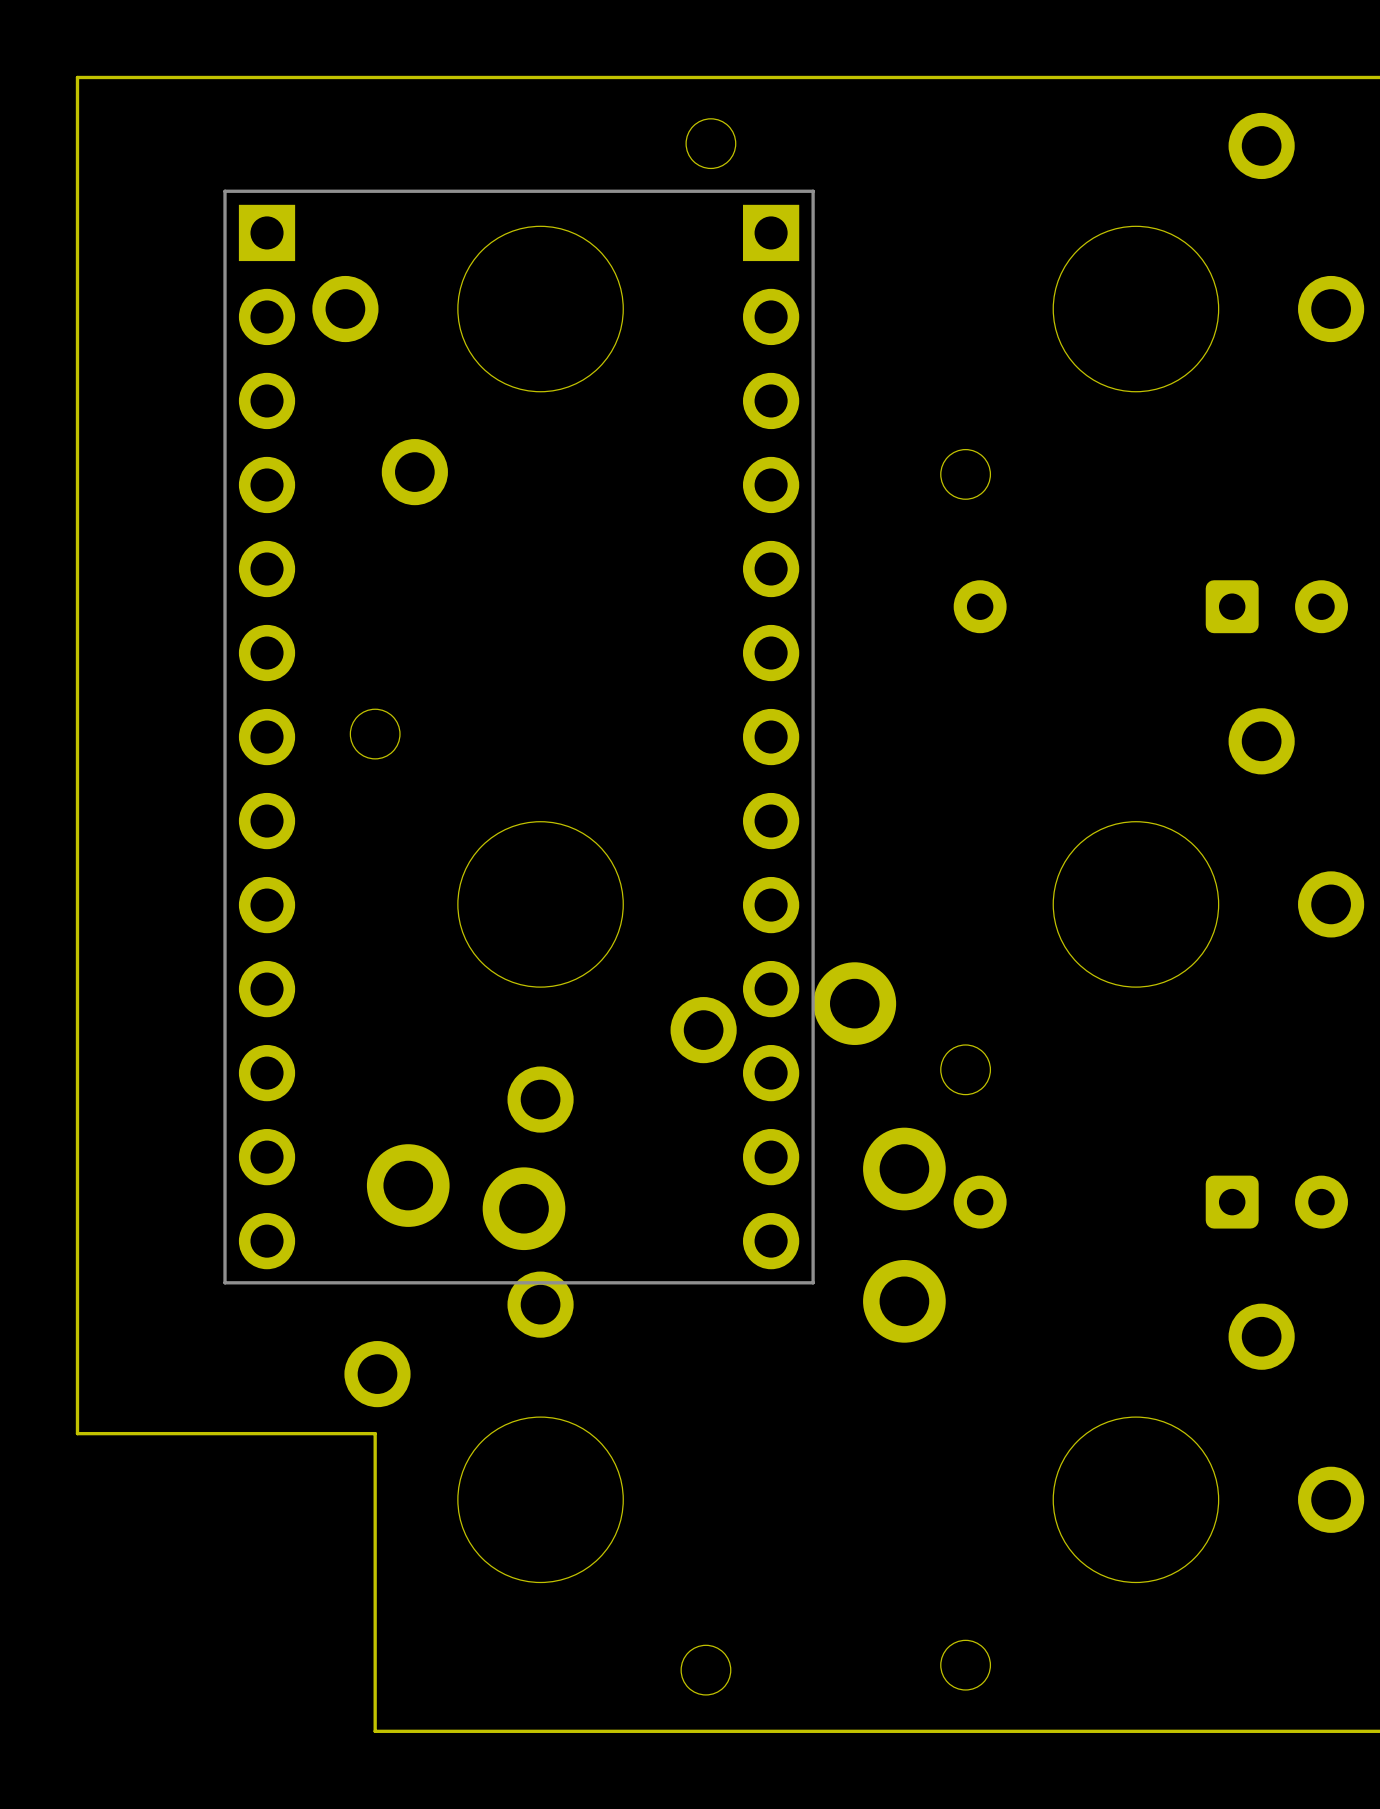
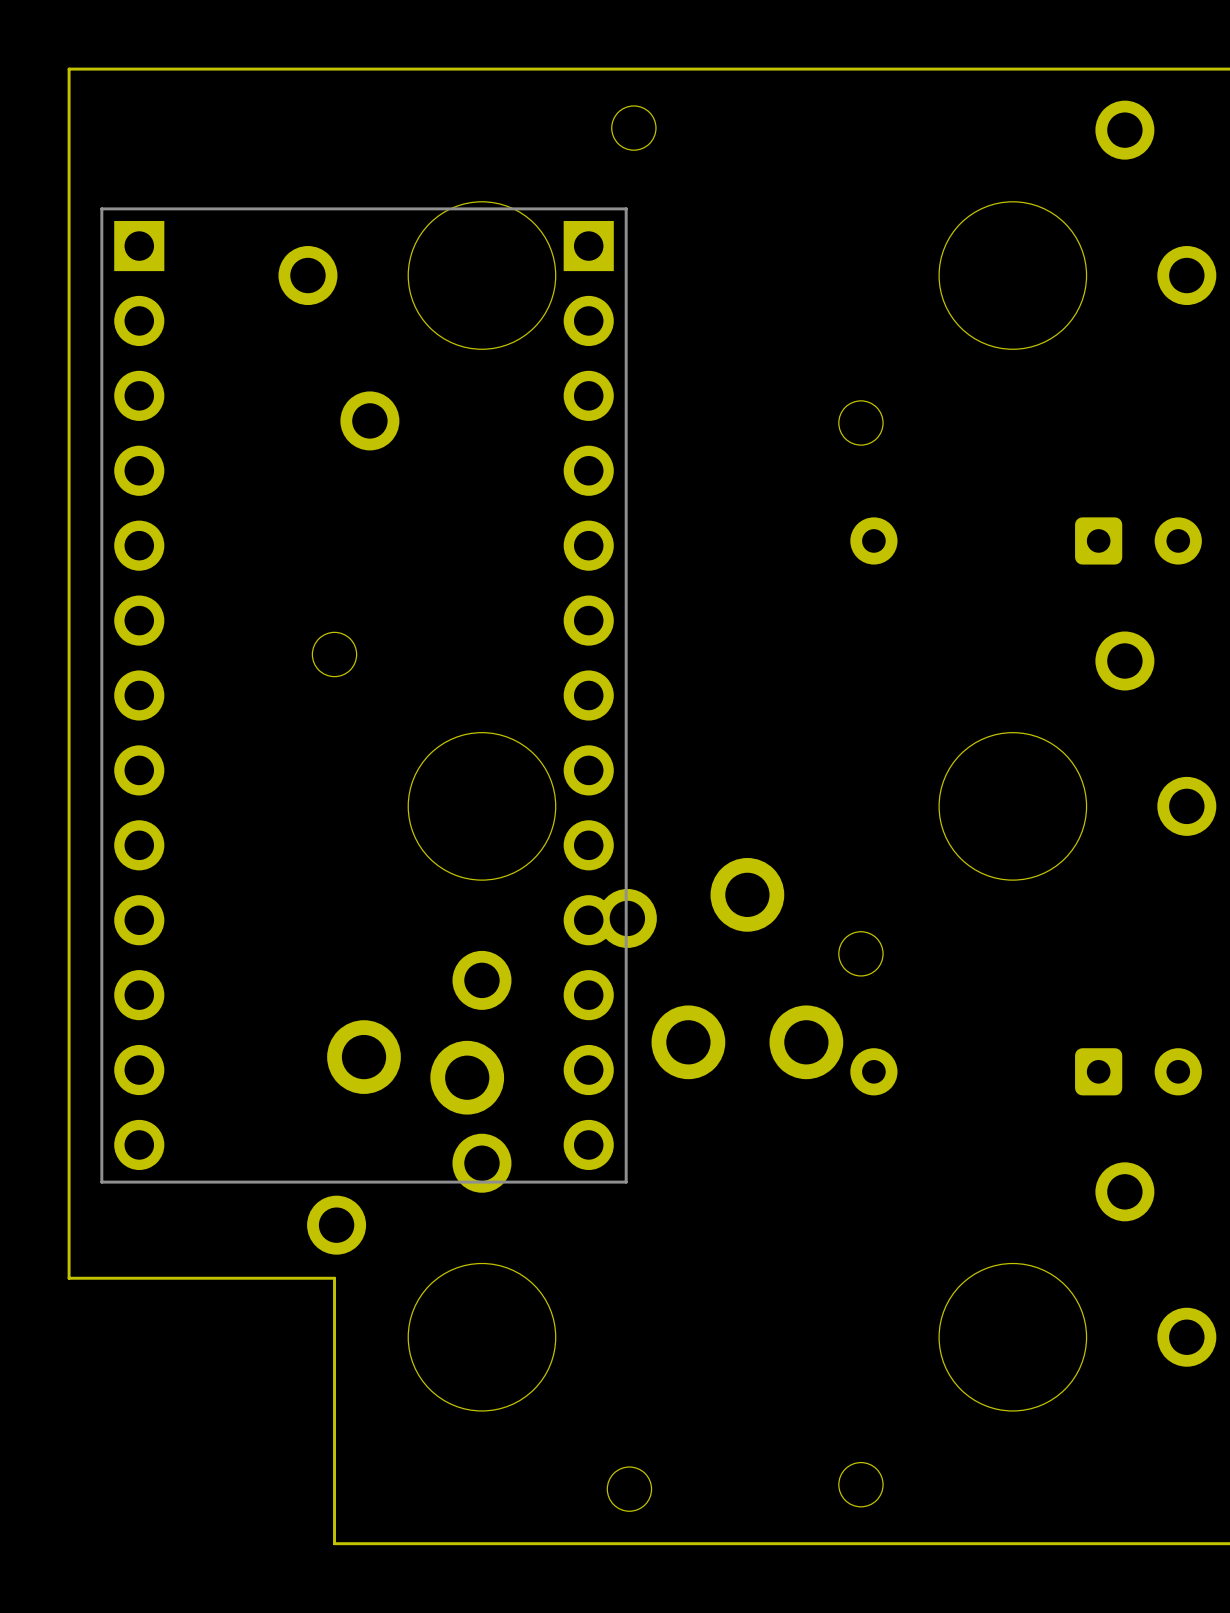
line: (813, 191) (813, 1282) (225, 1282) (225, 191) (813, 191) -> (626, 208) (626, 1182) (101, 1182) (101, 208) (626, 208)
part position: (267, 737) -> (139, 695)
part position: (771, 737) -> (588, 695)
part position: (854, 1003) -> (747, 894)
part position: (904, 1301) -> (688, 1042)

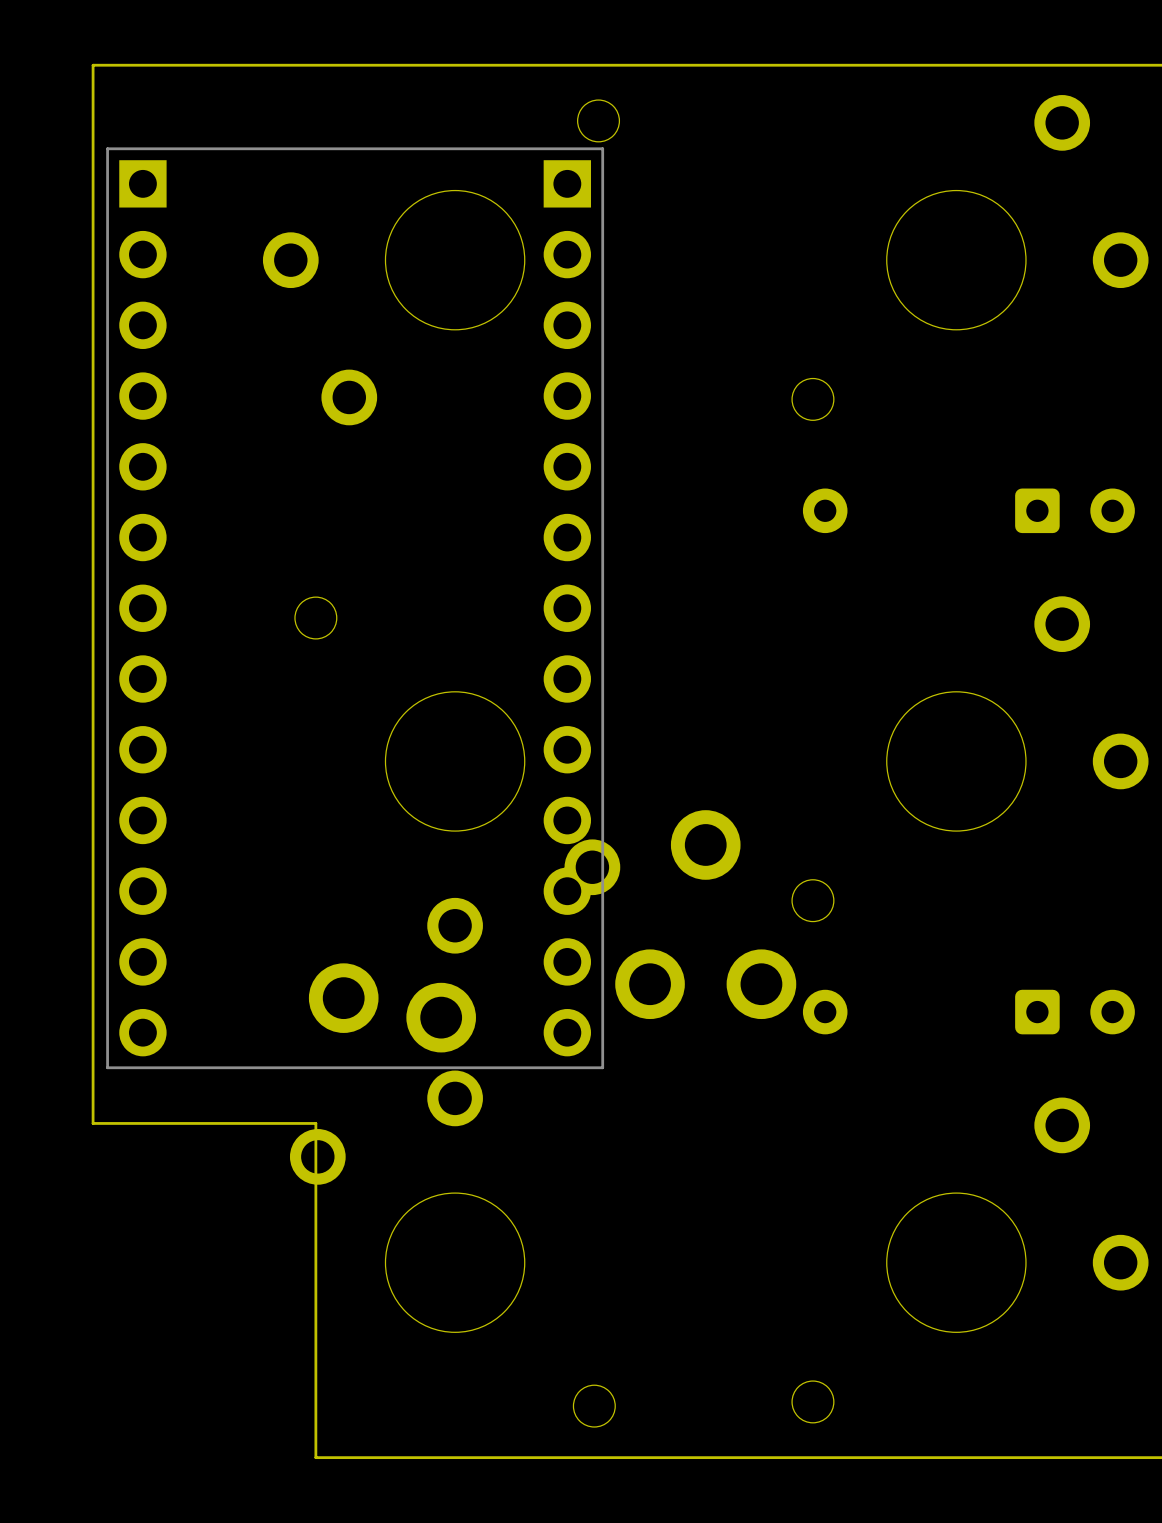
board edge: (98, 69) (69, 69) (69, 1278) (334, 1278) -> (93, 65) (93, 1123) (315, 1123) (315, 1207)
line: (626, 208) (626, 1182) (101, 1182) (101, 208) (626, 208) -> (602, 148) (602, 1067) (107, 1067) (107, 148) (602, 148)
part position: (139, 695) -> (142, 608)
part position: (588, 695) -> (567, 608)

